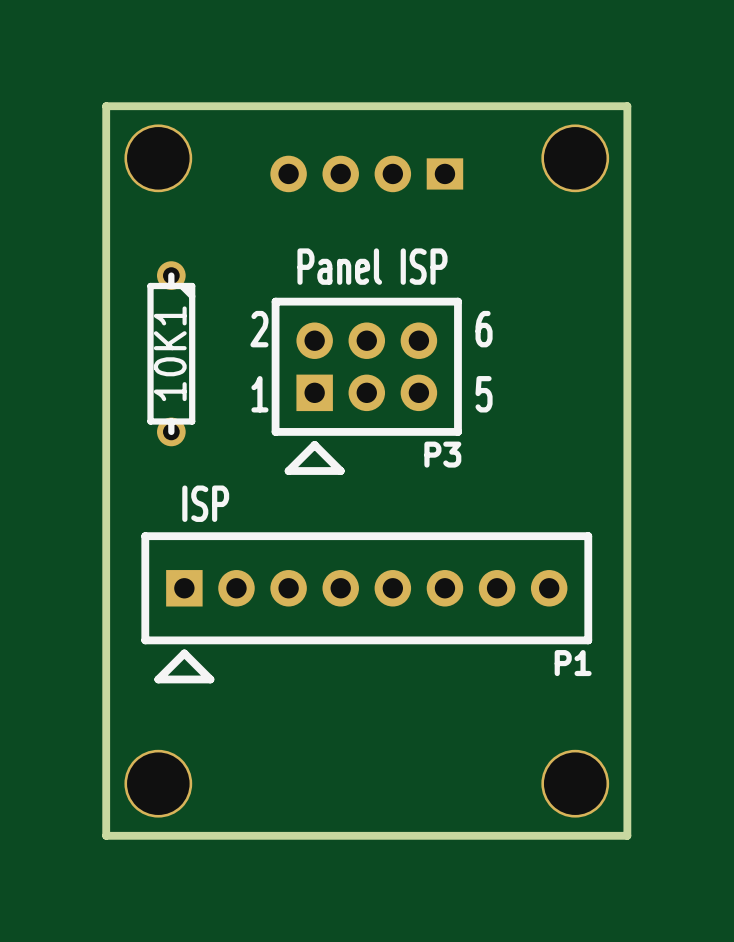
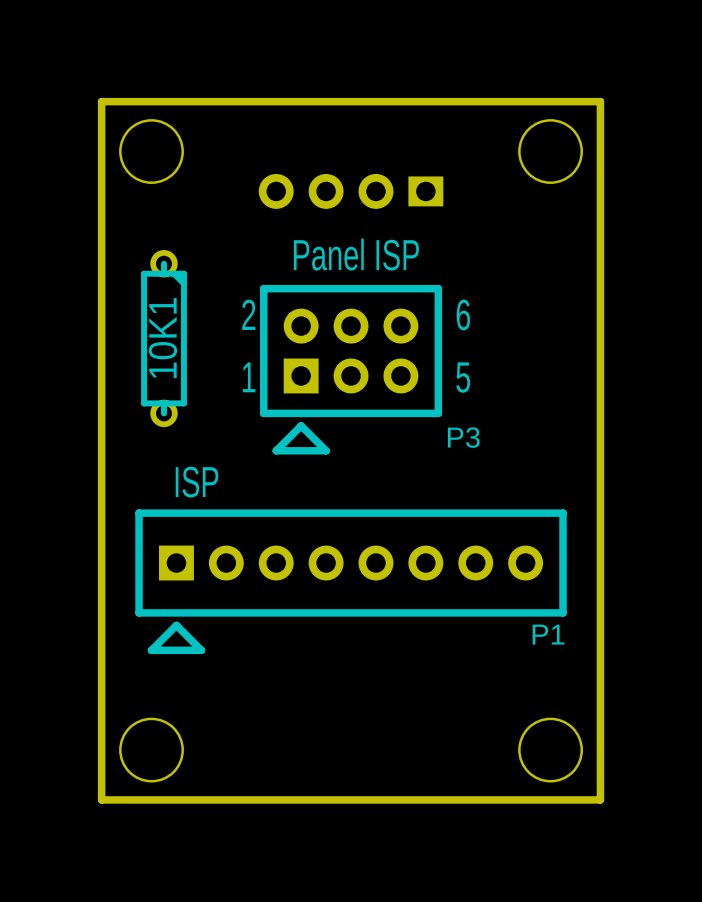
part position: (366, 173) -> (351, 191)
P3 name position: P3 (442, 454) -> P3 (463, 437)

